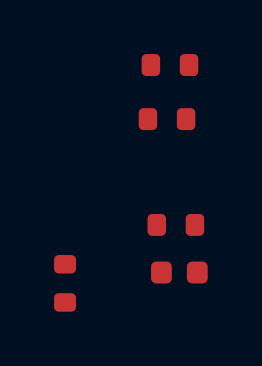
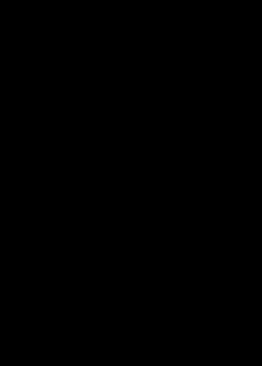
part: (169, 65) -> none
part: (167, 119) -> none
part: (175, 224) -> none
part: (179, 272) -> none
part: (65, 283) -> none

